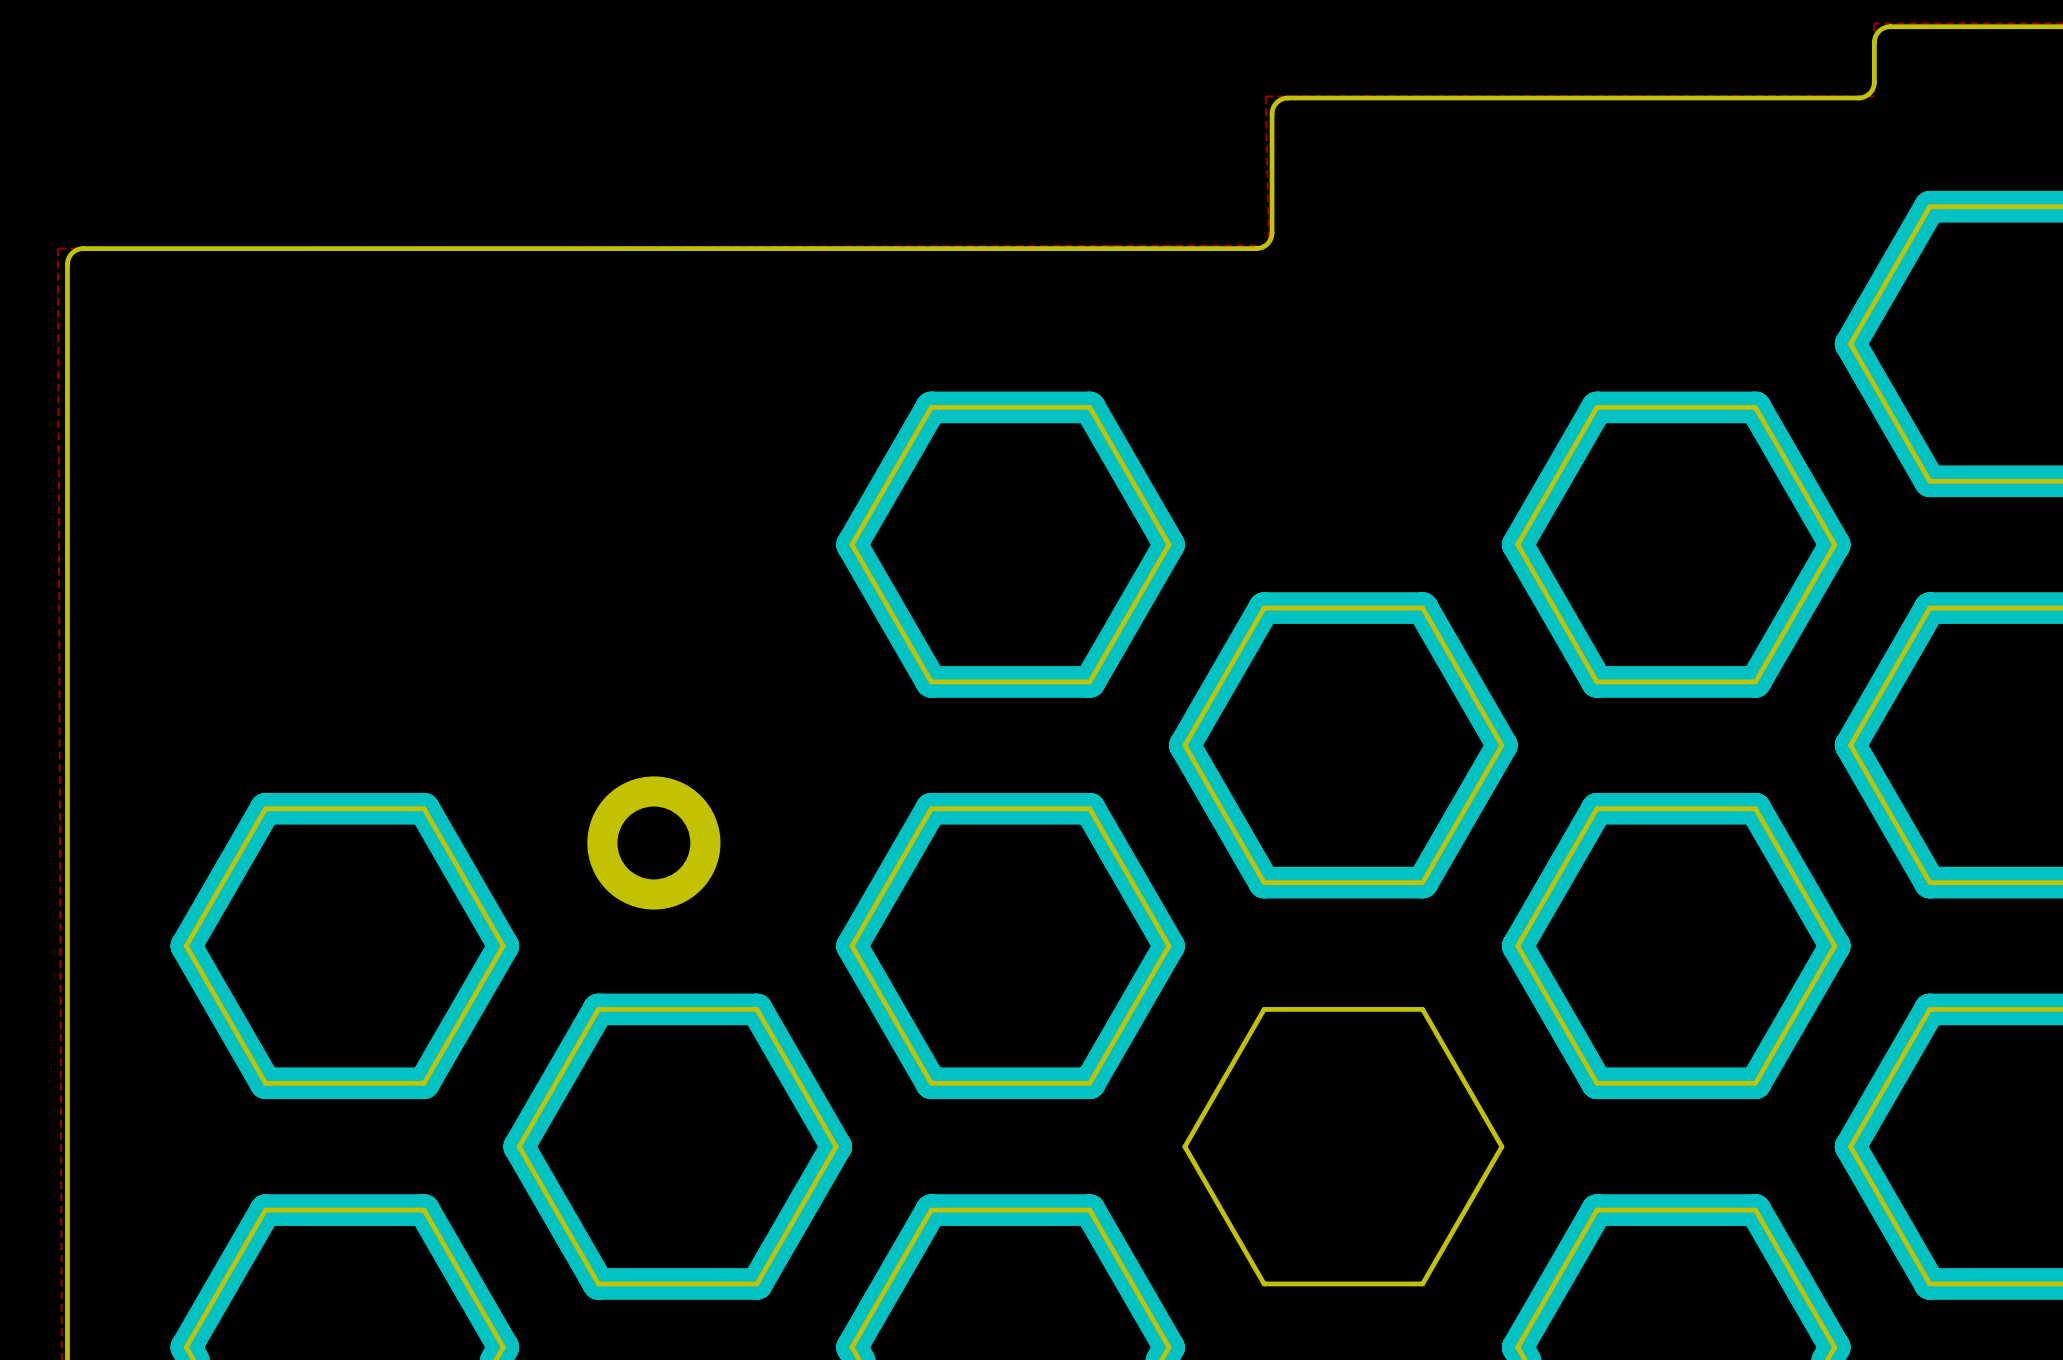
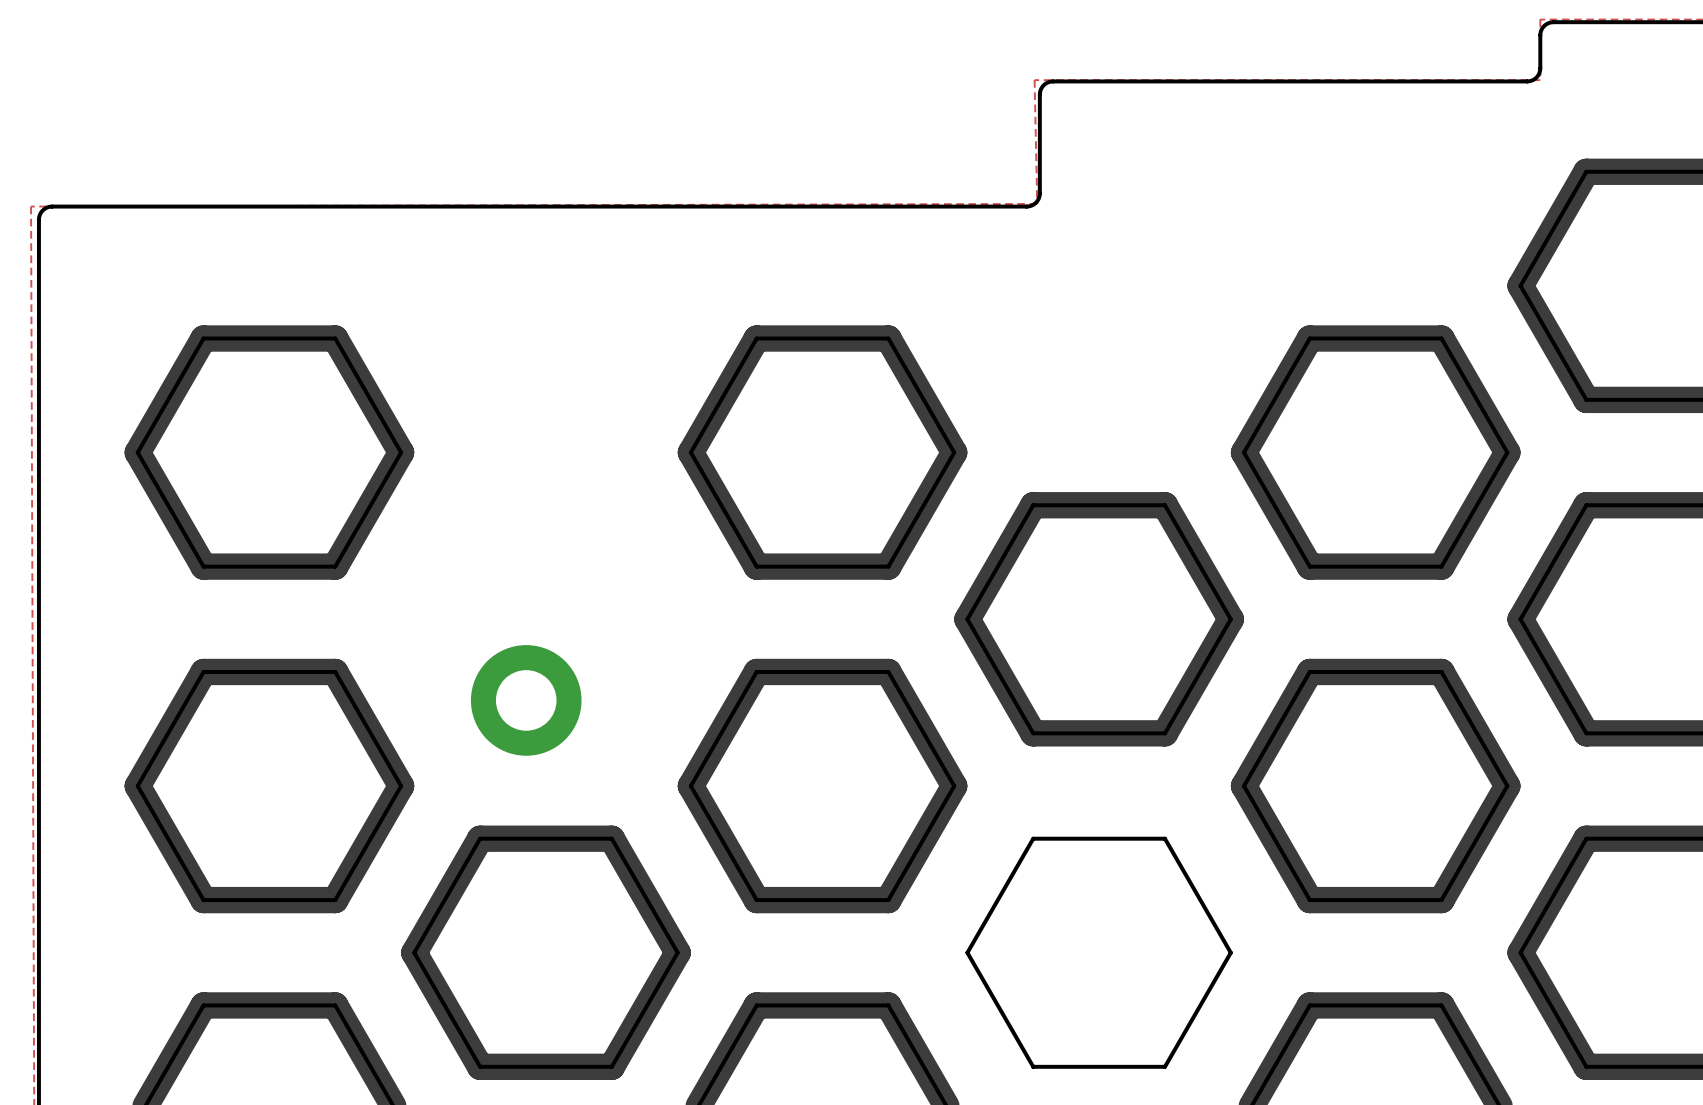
line: none -> (203, 338) (335, 338) (401, 452) (335, 566) (203, 566) (137, 452) (203, 338)
board edge: none -> (203, 338) (335, 338) (401, 452) (335, 566) (203, 566) (137, 452) (203, 338)

